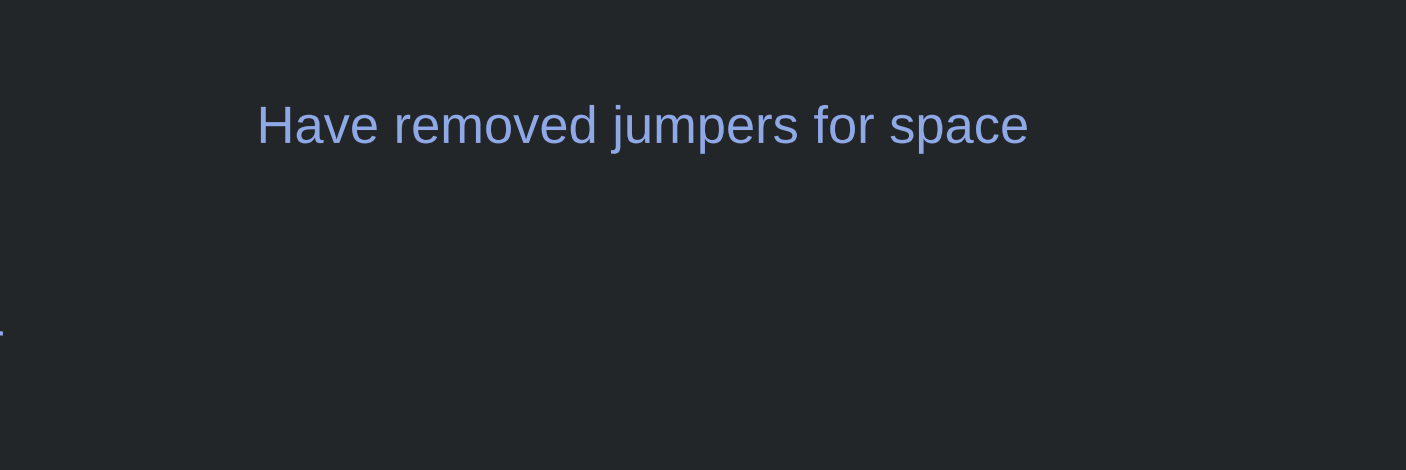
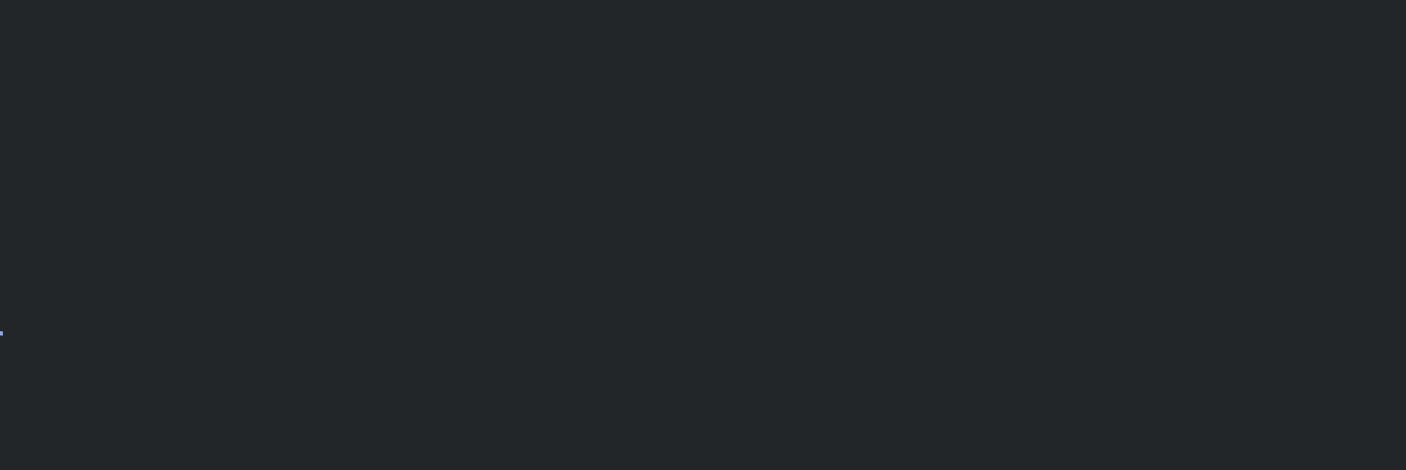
text: Have removed jumpers for space (643, 129) -> none

